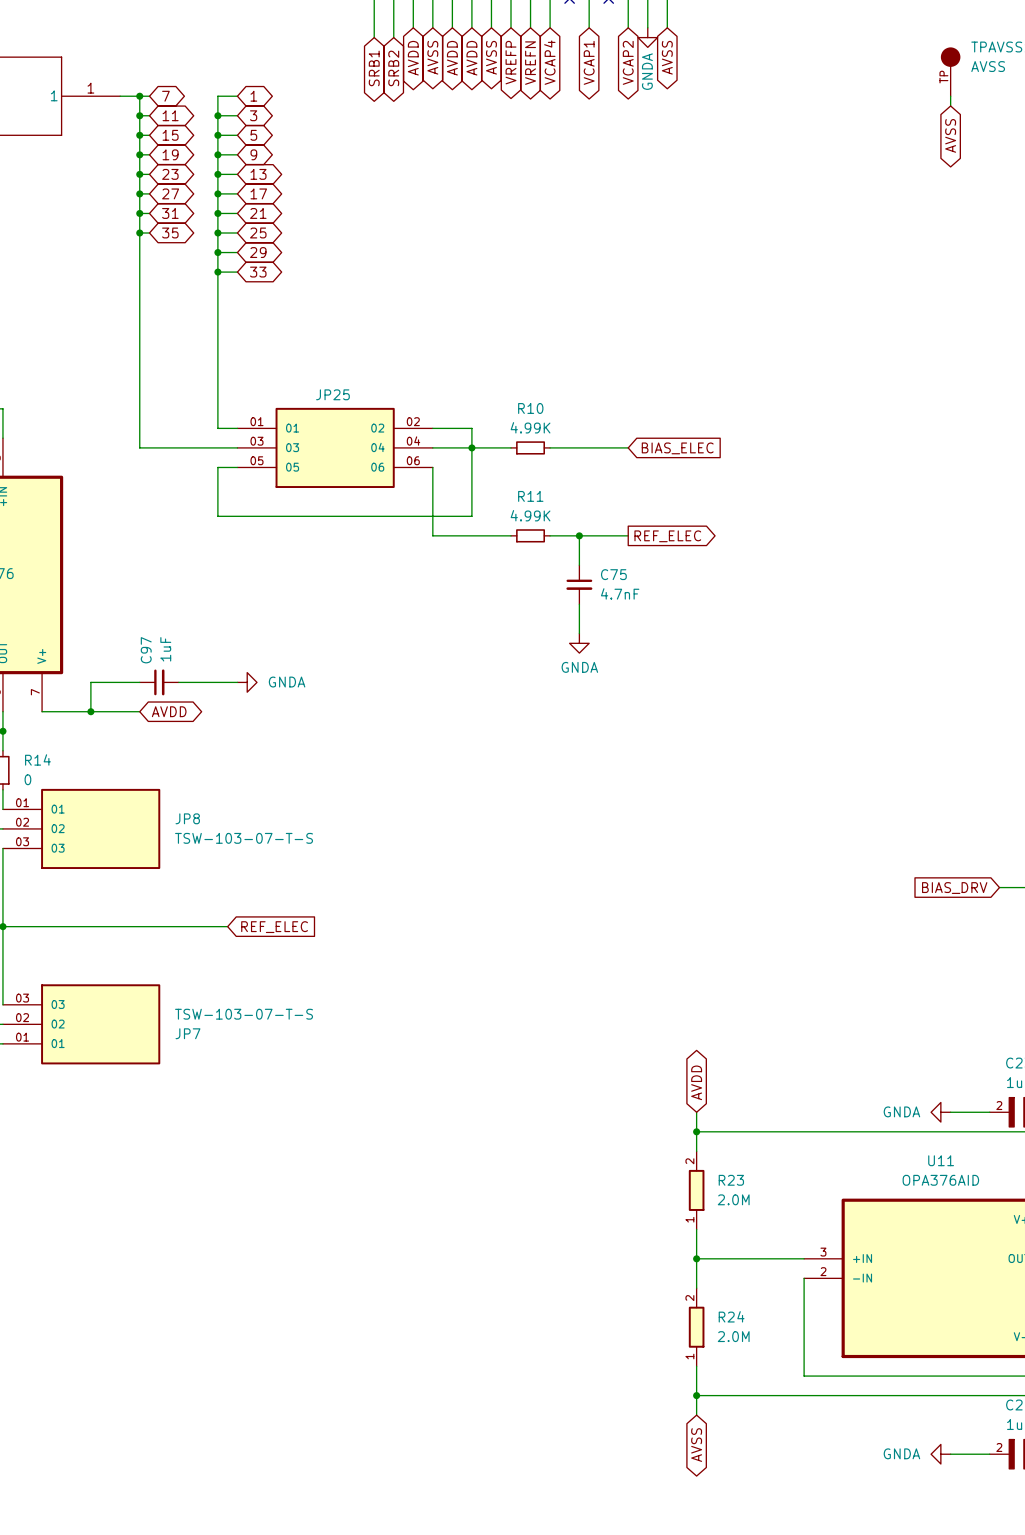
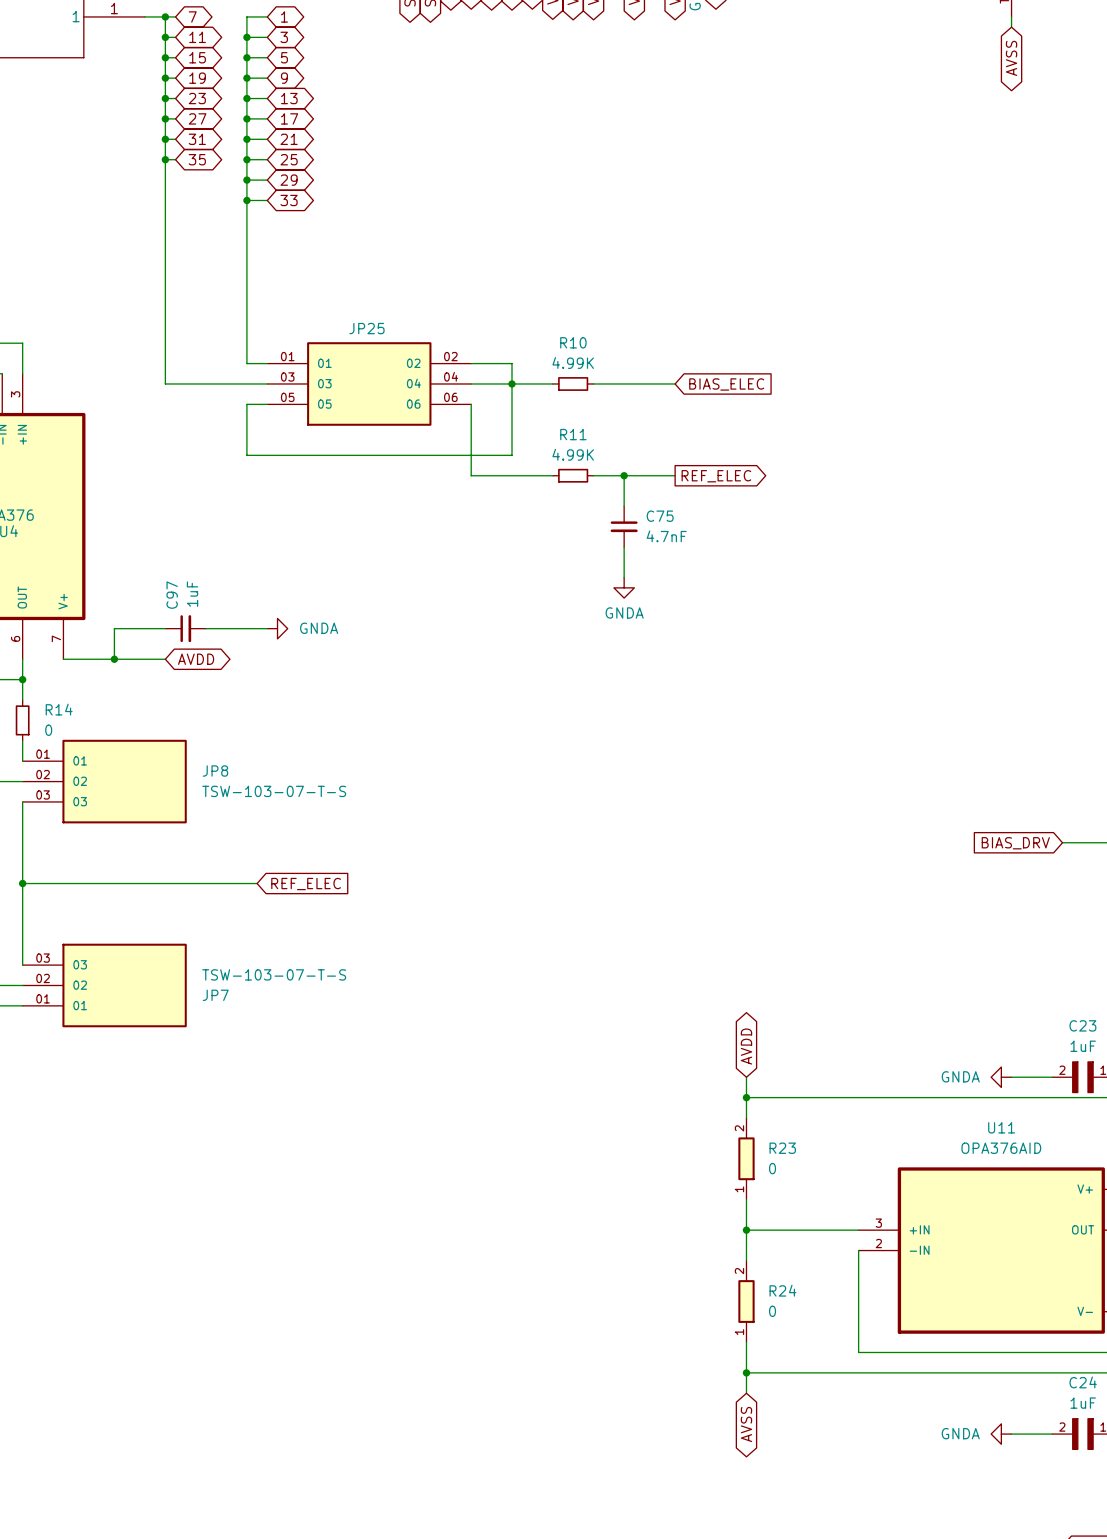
R23 value: 2.0M (733, 1199) -> 0 (772, 1168)
R24 value: 2.0M (733, 1336) -> 0 (772, 1311)

